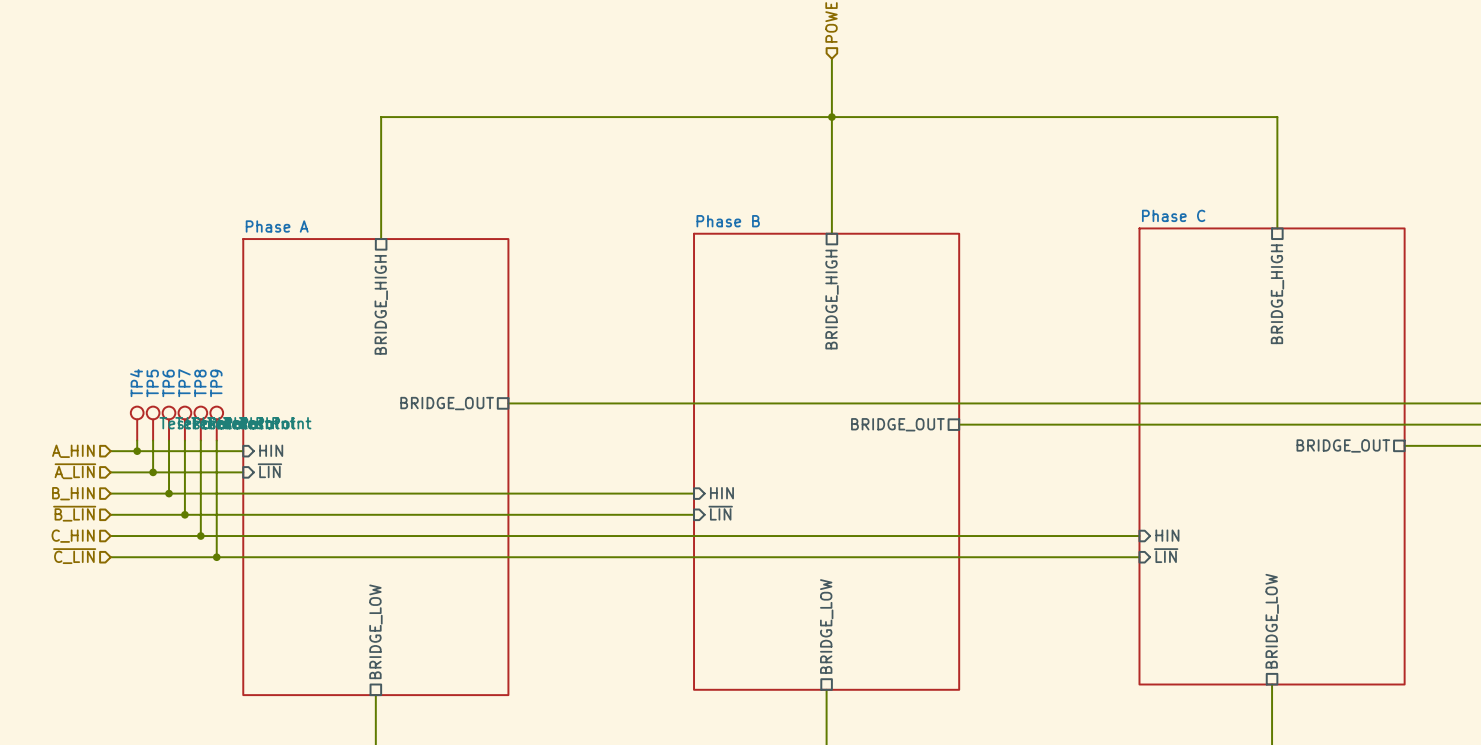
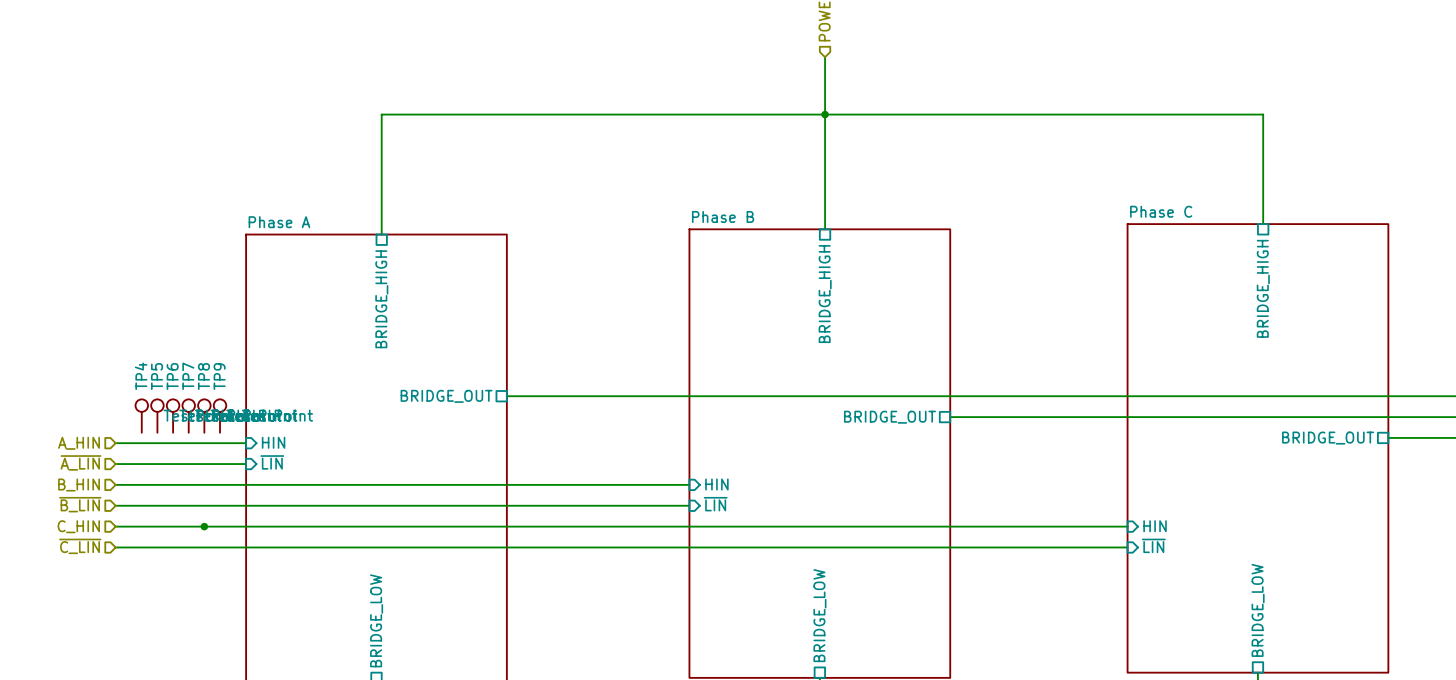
wire: (137, 440) (137, 451) -> none
wire: (153, 440) (153, 472) -> none
wire: (169, 440) (169, 493) -> none
wire: (184, 440) (184, 514) -> none
wire: (200, 440) (200, 536) -> none
wire: (216, 440) (216, 557) -> none
junction: (137, 451) -> none
junction: (153, 472) -> none
junction: (169, 493) -> none
junction: (184, 514) -> none
junction: (216, 557) -> none

